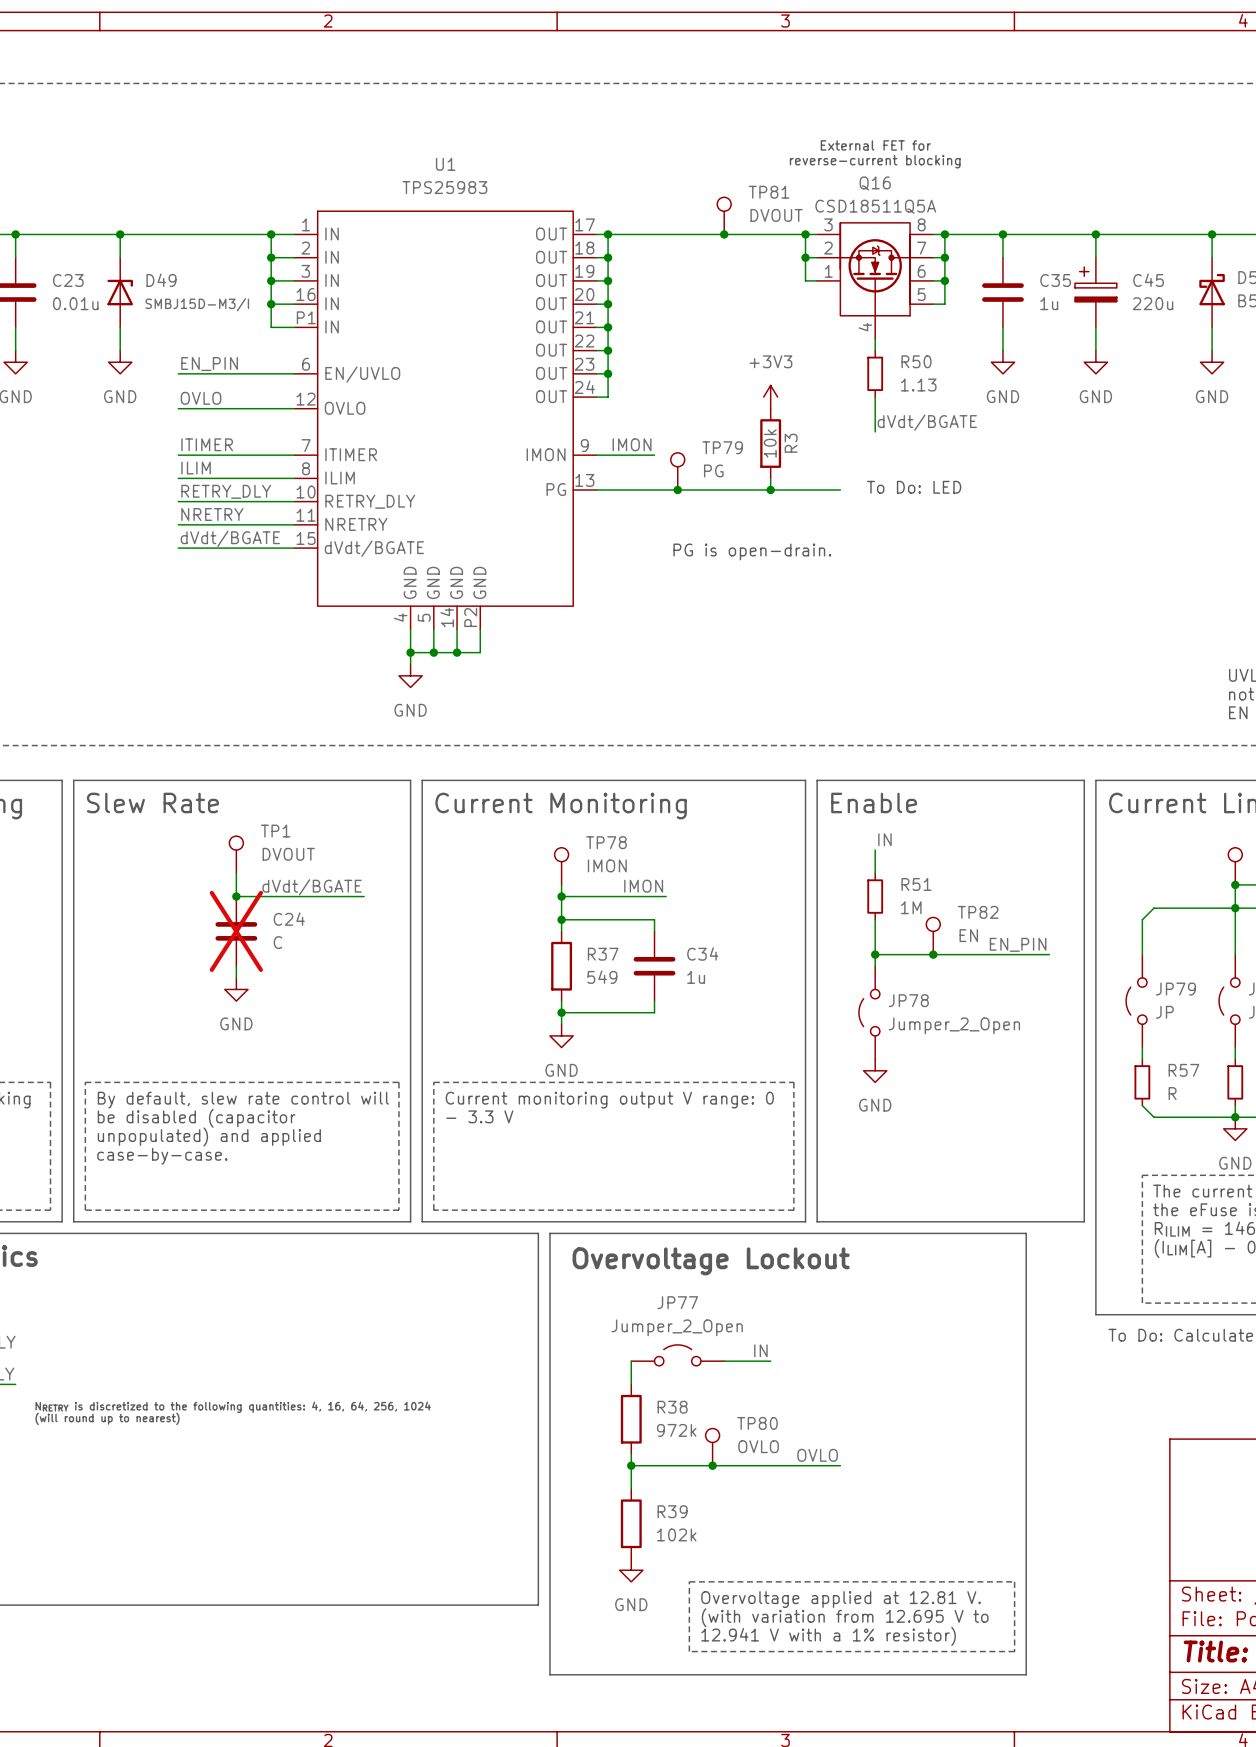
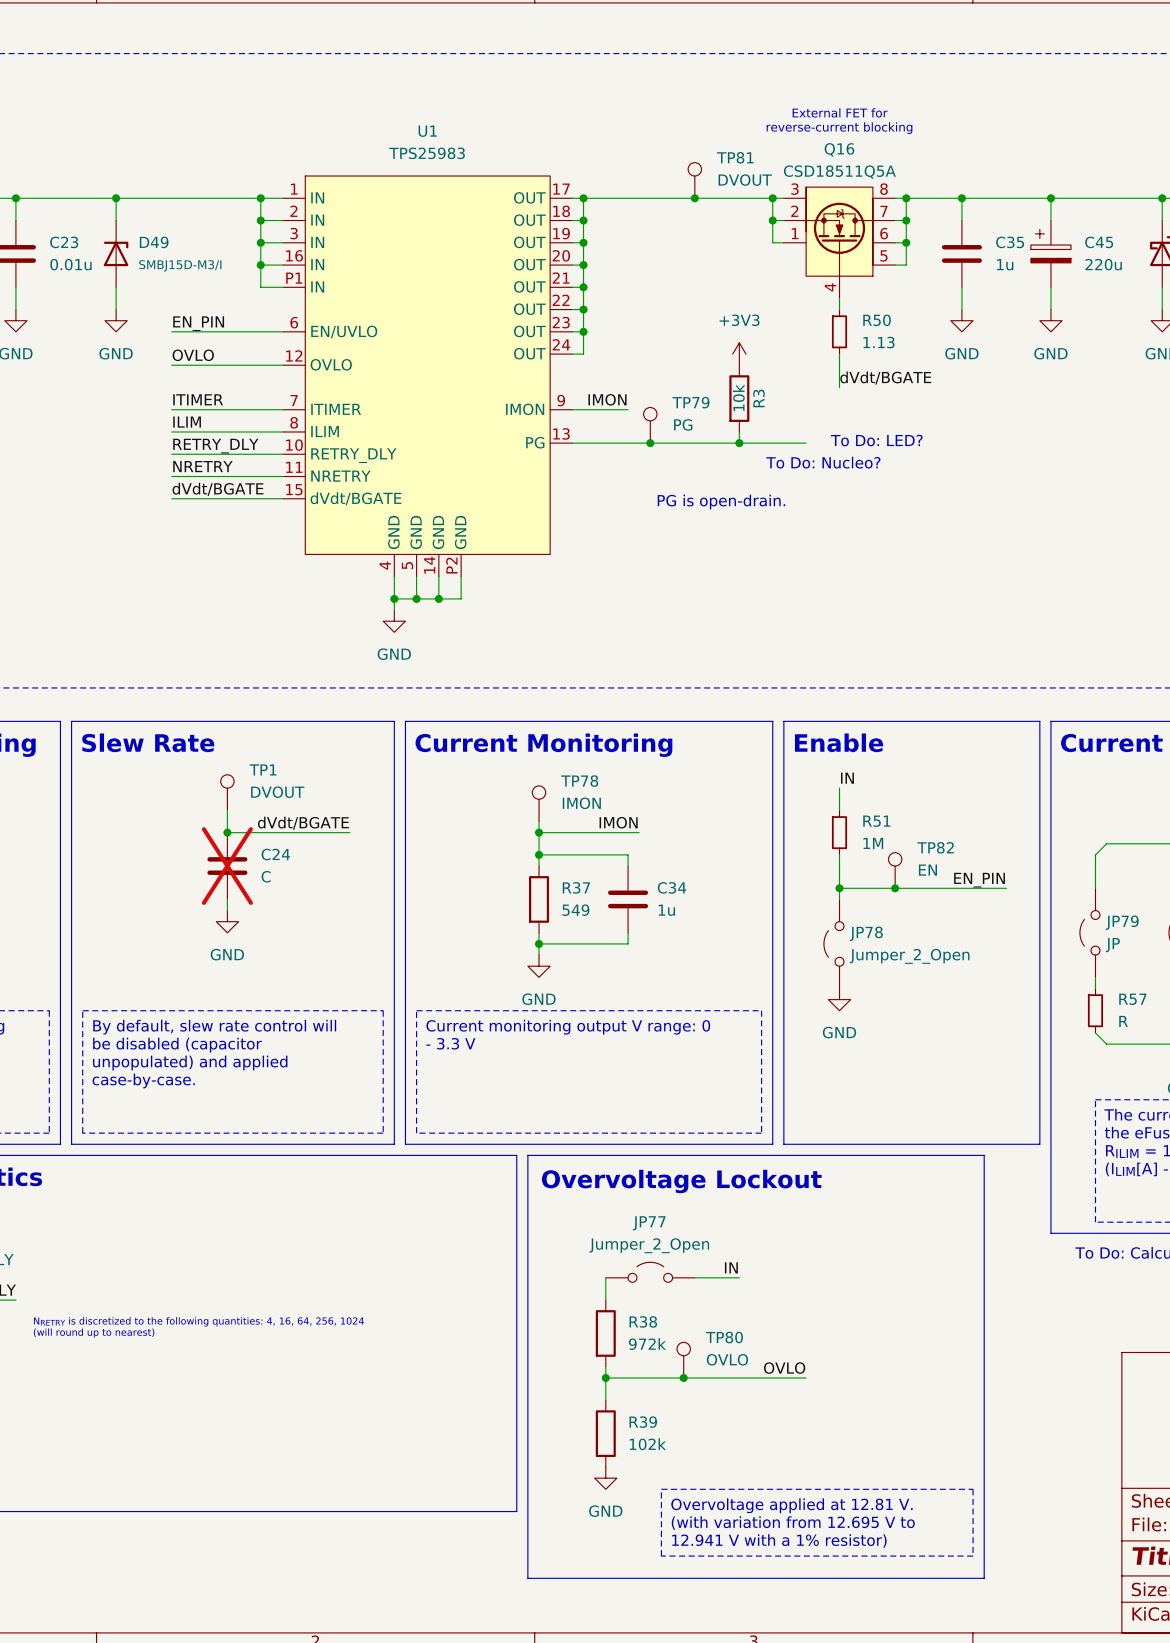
text: To Do: LED (914, 487) -> To Do: LED? (876, 440)
text: none -> To Do: Nucleo? (823, 462)

